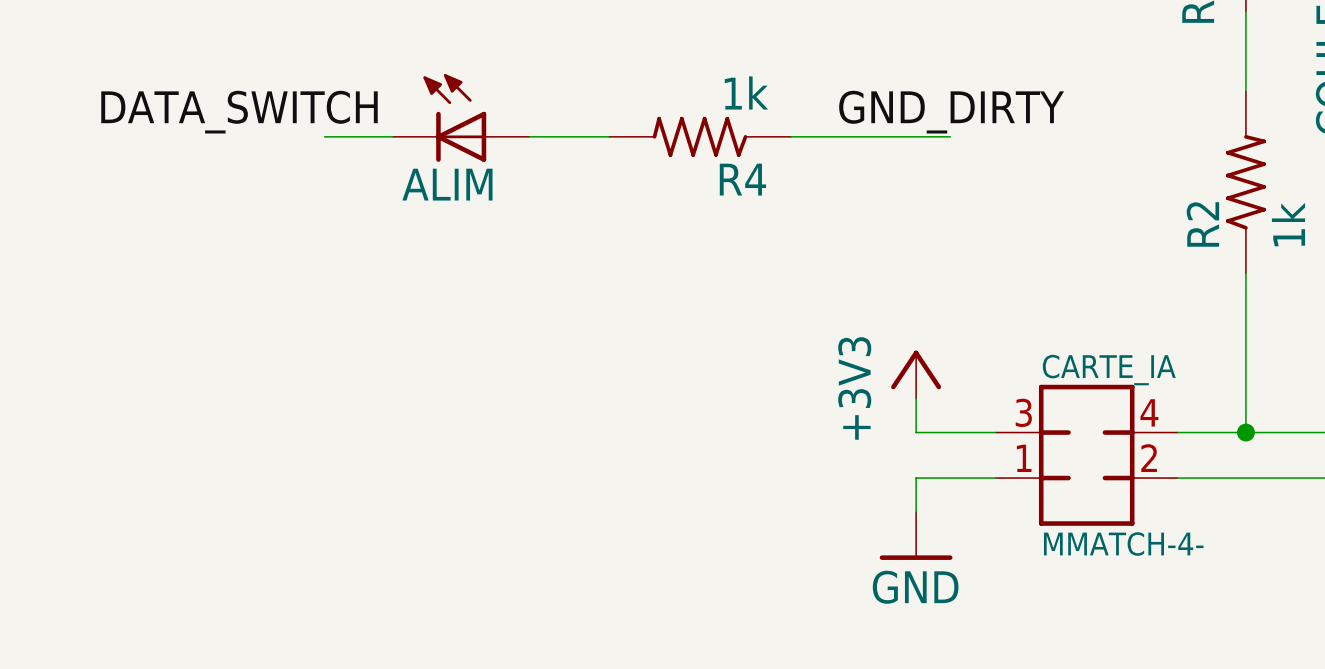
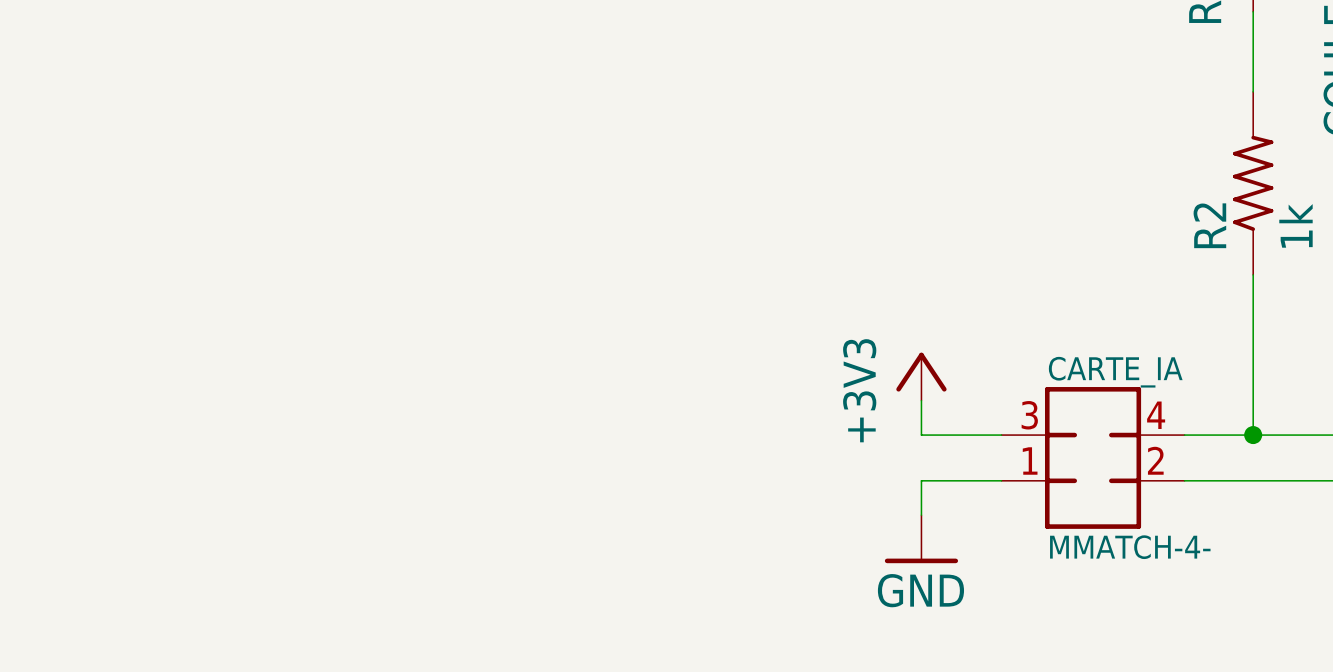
label: DATA_SWITCH (239, 112) -> none
label: GND_DIRTY (951, 112) -> none
ALIM: (461, 117) -> none
wire: (324, 136) (392, 136) -> none
wire: (529, 136) (609, 136) -> none
R4: 1k (700, 136) -> none
wire: (791, 136) (950, 136) -> none

